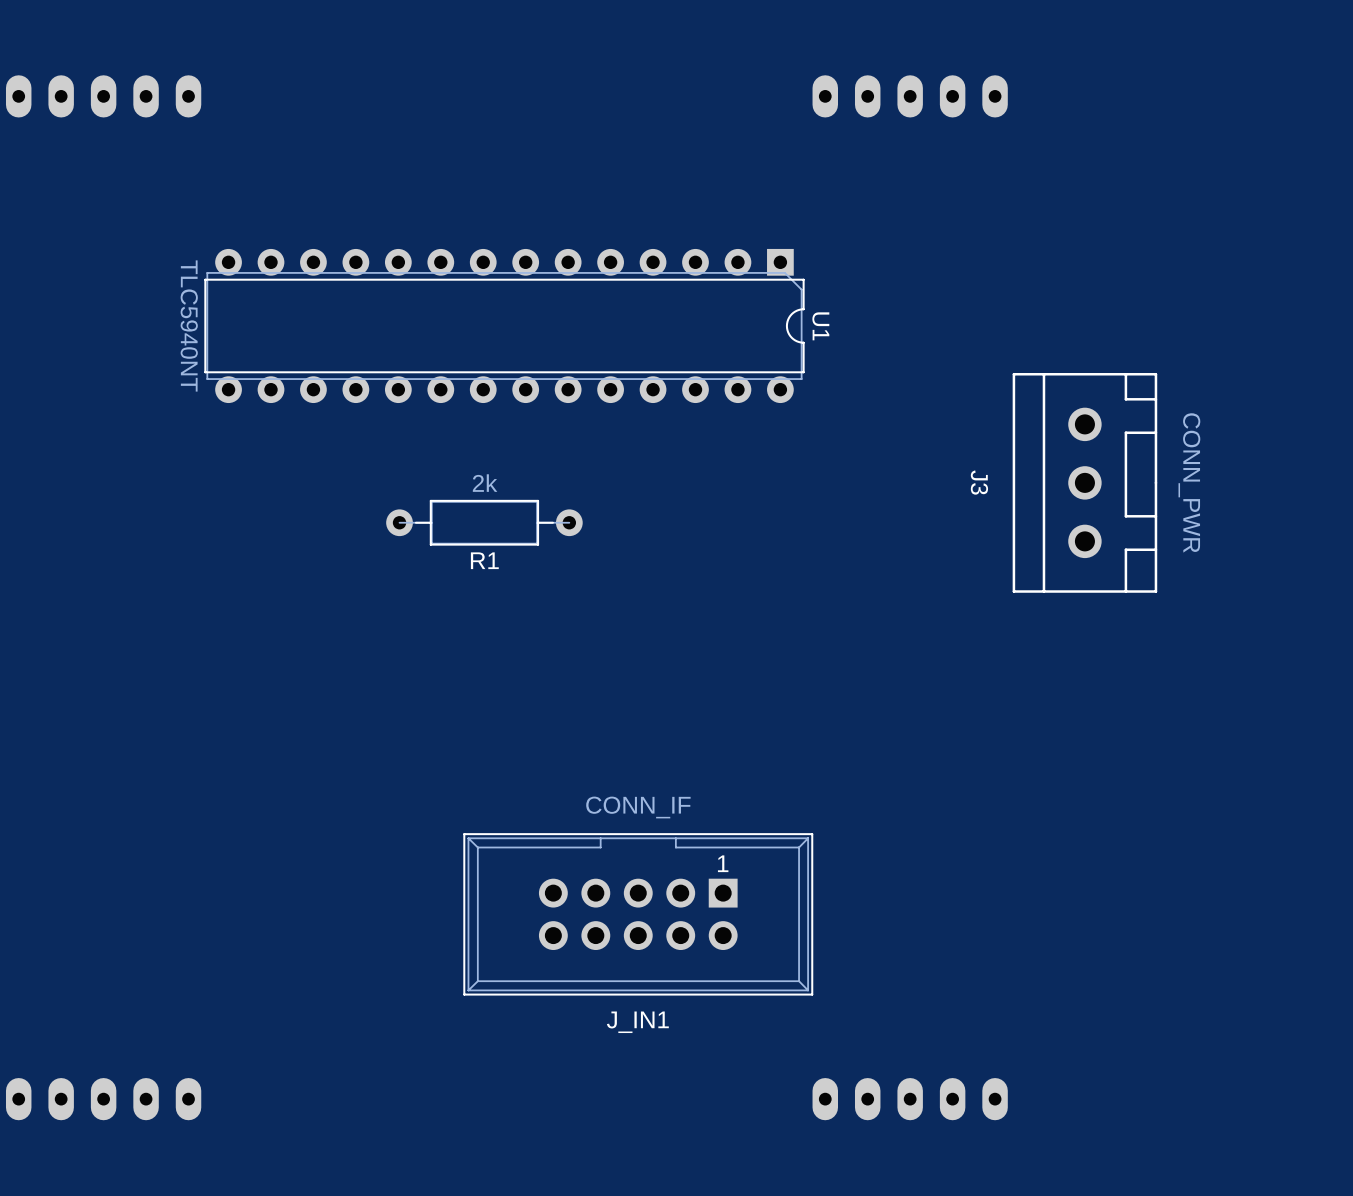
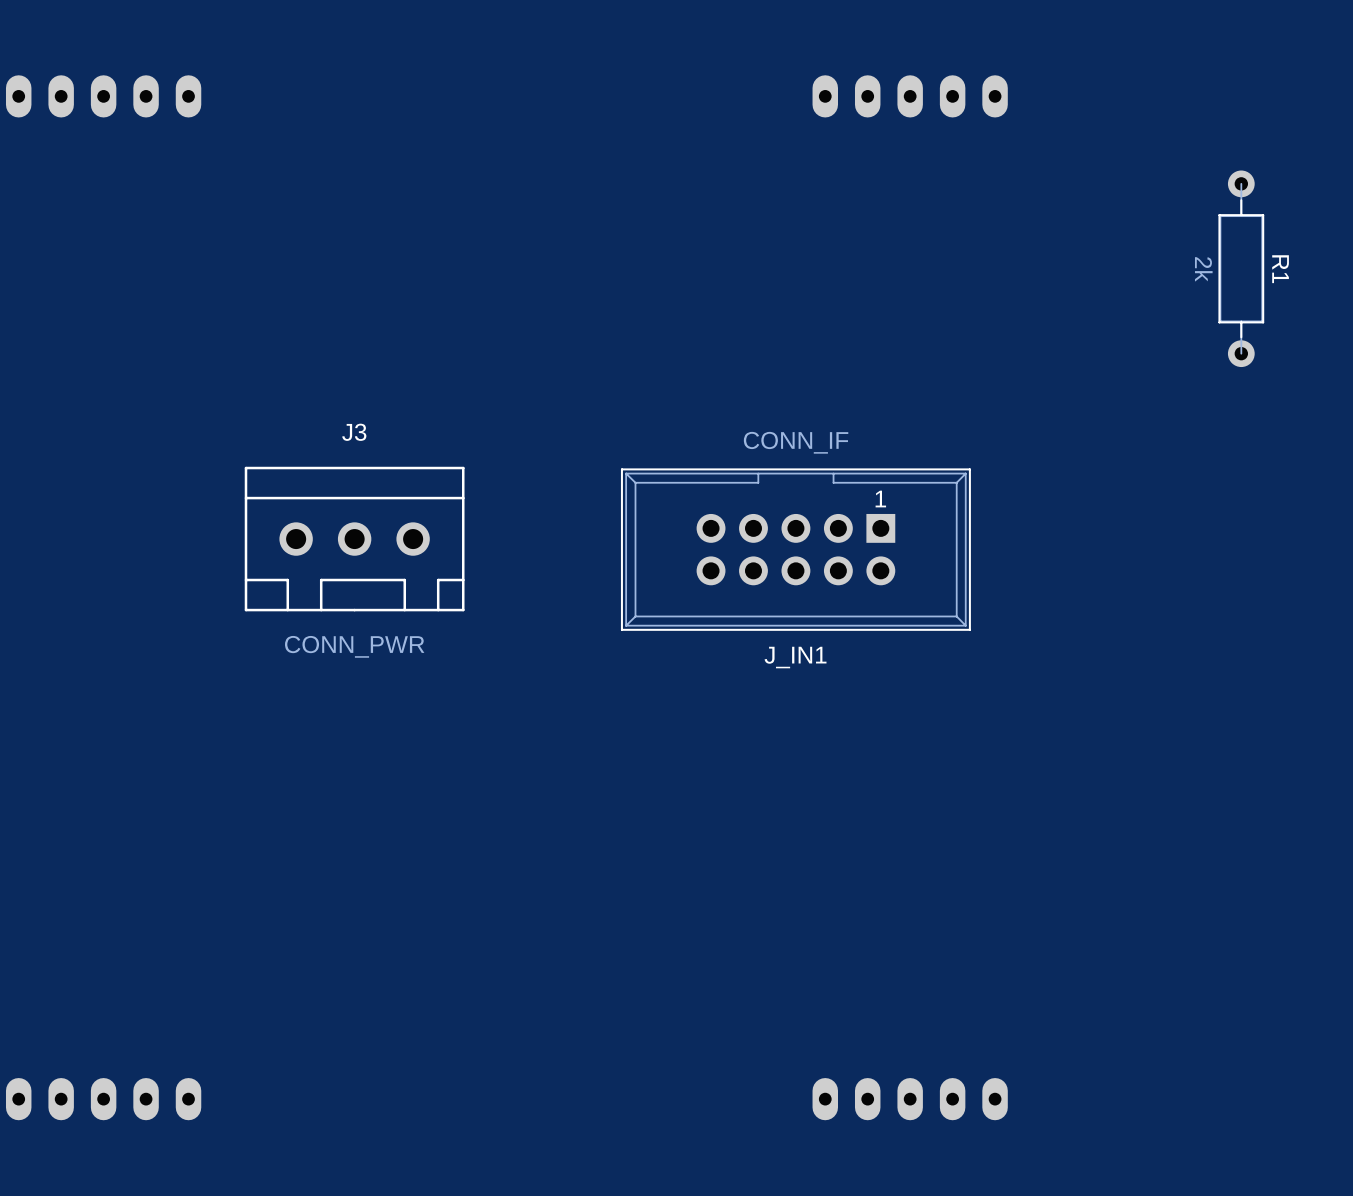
U1: TLC5940NT (504, 325) -> none
J3 rotation: 0° (1084, 482) -> 90° clockwise (354, 539)
J3 position: (1084, 482) -> (354, 539)
R1 value position: 2k (485, 483) -> 2k (1203, 269)
R1 rotation: 0° (484, 522) -> 90° clockwise (1241, 268)
R1 position: (484, 522) -> (1241, 268)
R1 name position: R1 (484, 560) -> R1 (1280, 269)
J_IN1 position: (638, 914) -> (795, 549)

